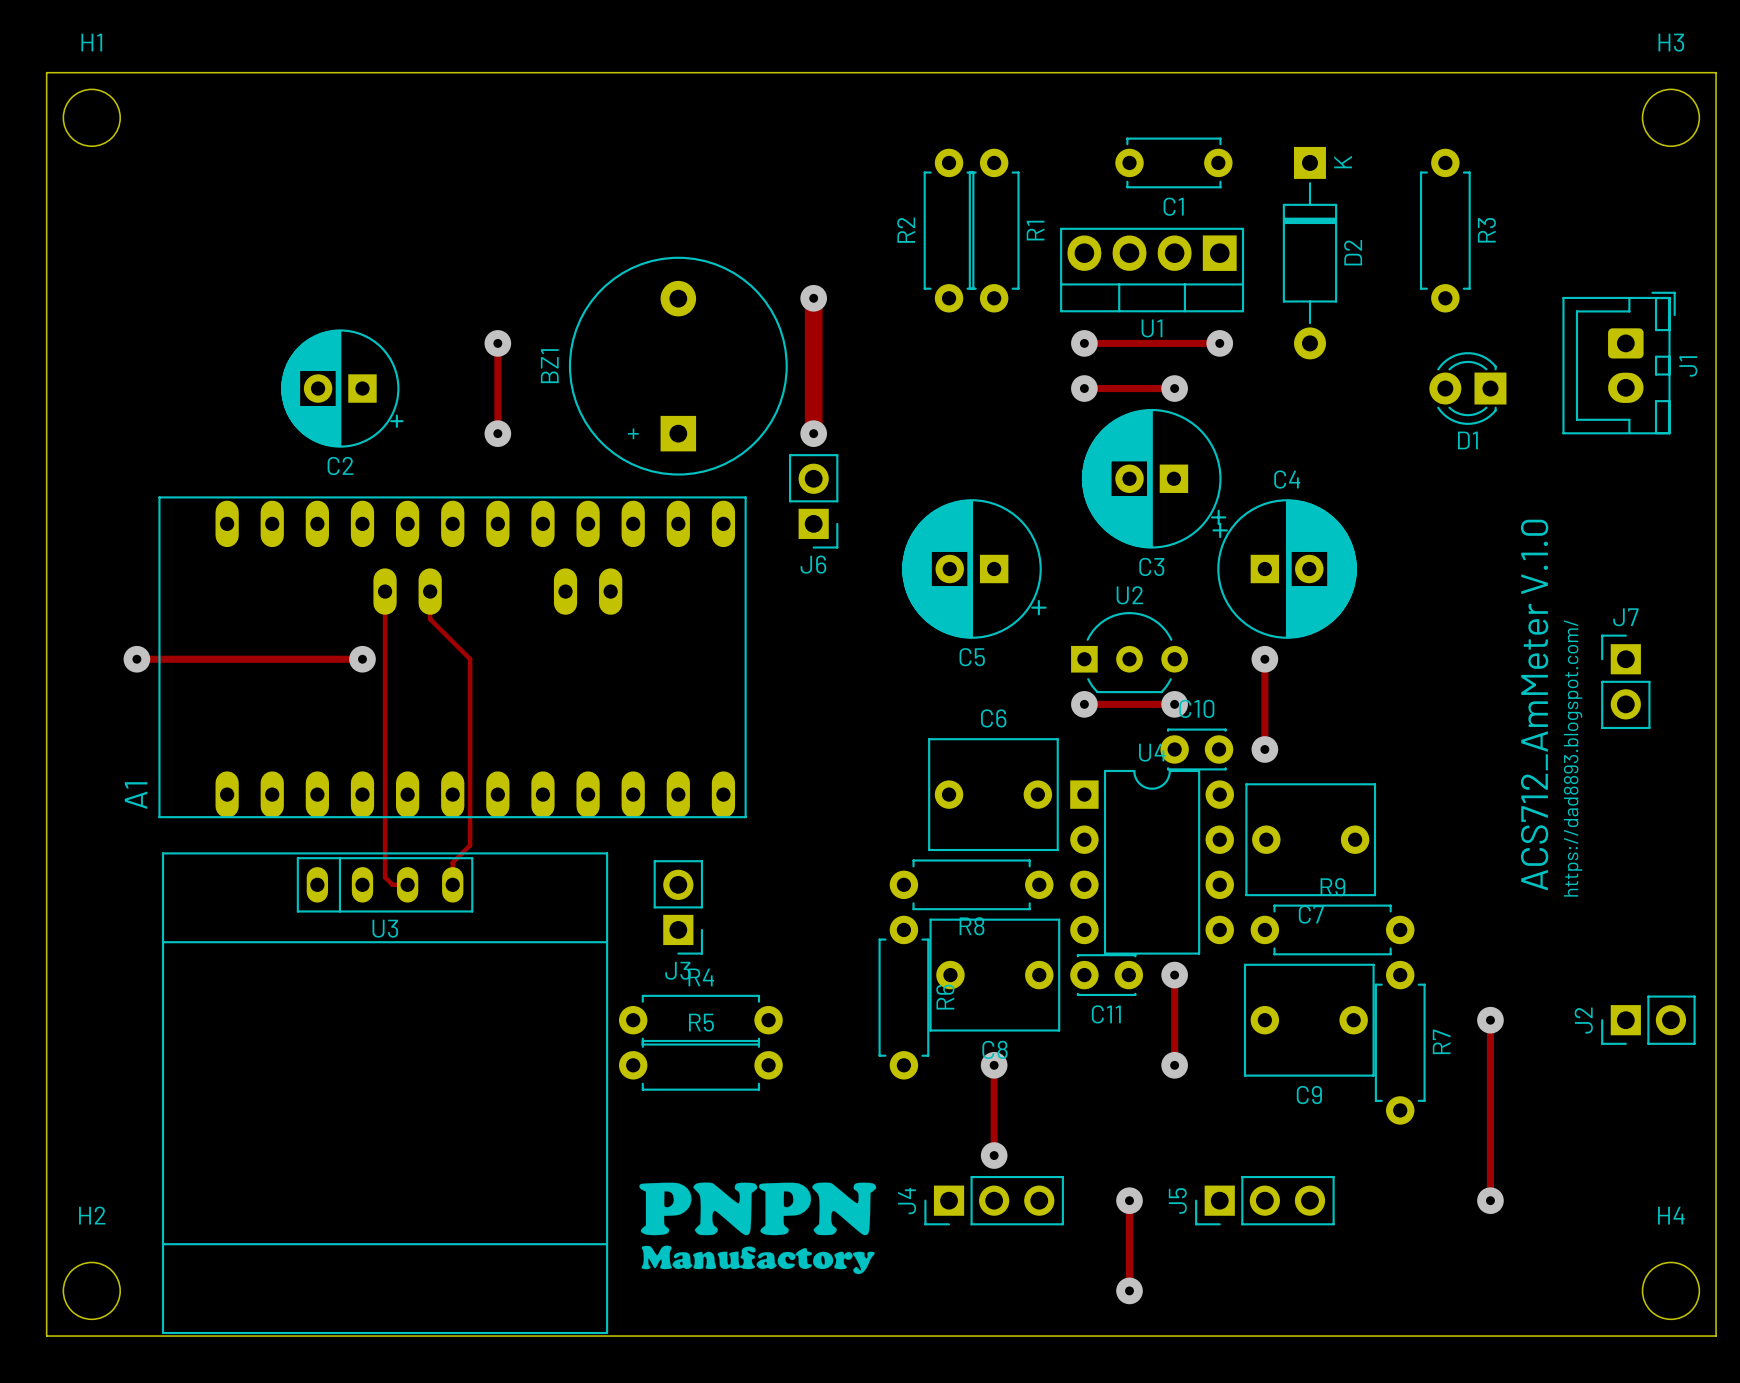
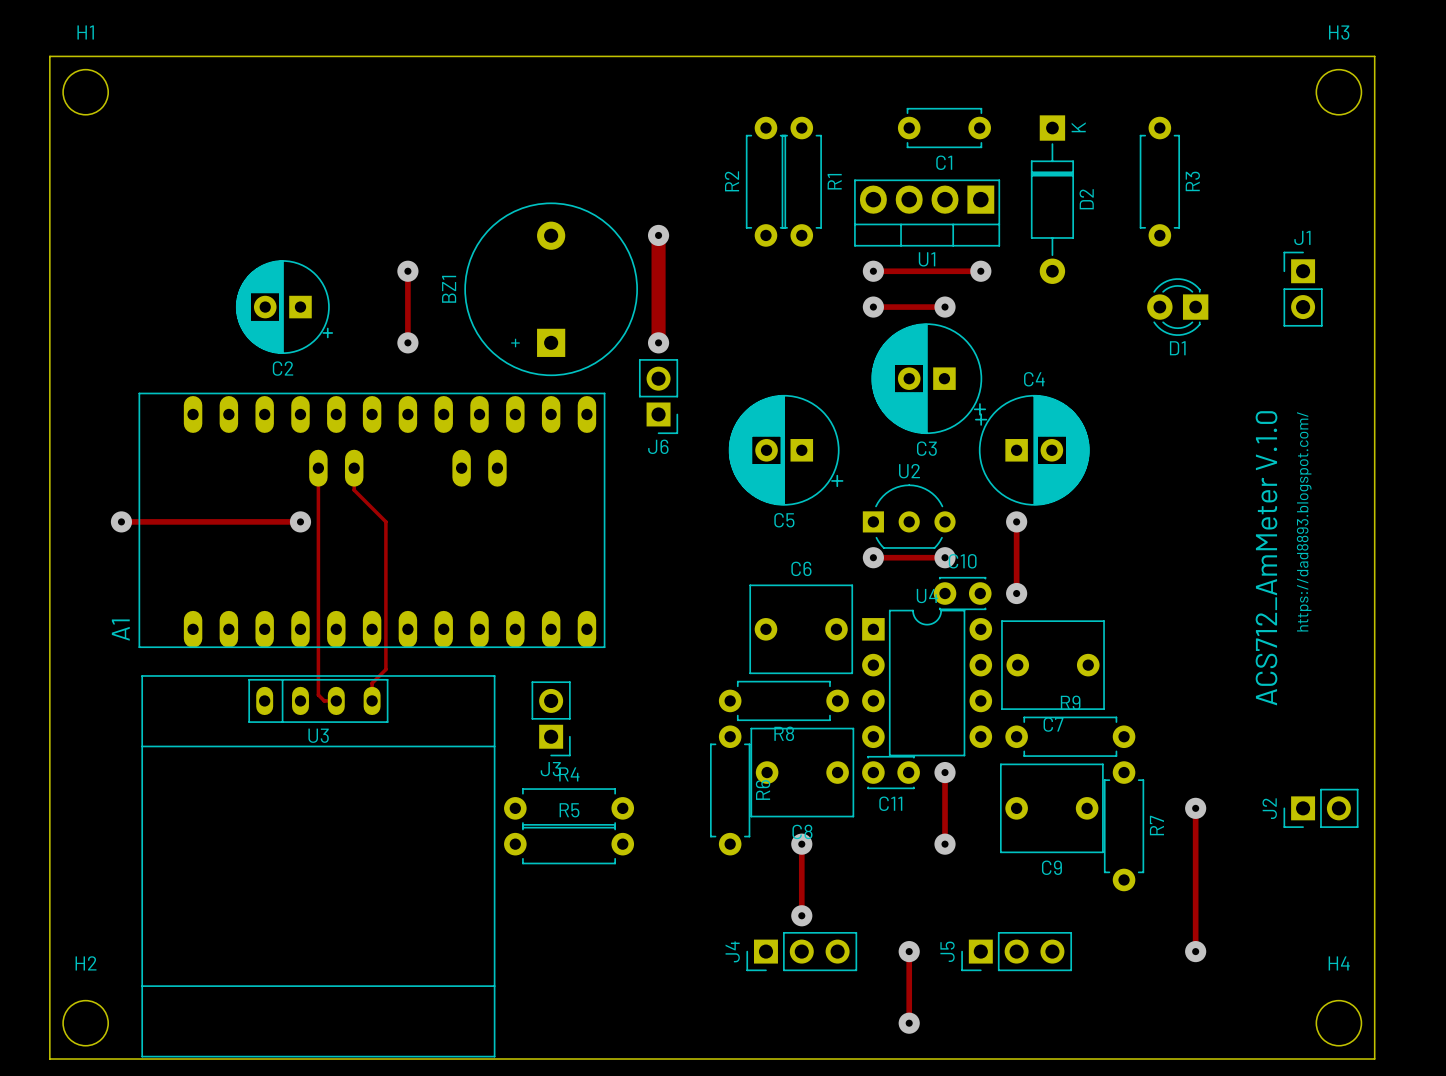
J1 footprint: [1562, 291, 1676, 435] -> [1283, 251, 1323, 327]
J1 name position: J1 (1688, 366) -> J1 (1302, 237)
J7: (1625, 681) -> none
text position: ACS712_AmMeter V.1.0 (1534, 705) -> ACS712_AmMeter V.1.0 (1266, 558)
text position: https://dad8893.blogspot.com/ (1573, 758) -> https://dad8893.blogspot.com/ (1304, 521)
drawing: [639, 1182, 877, 1275] -> none

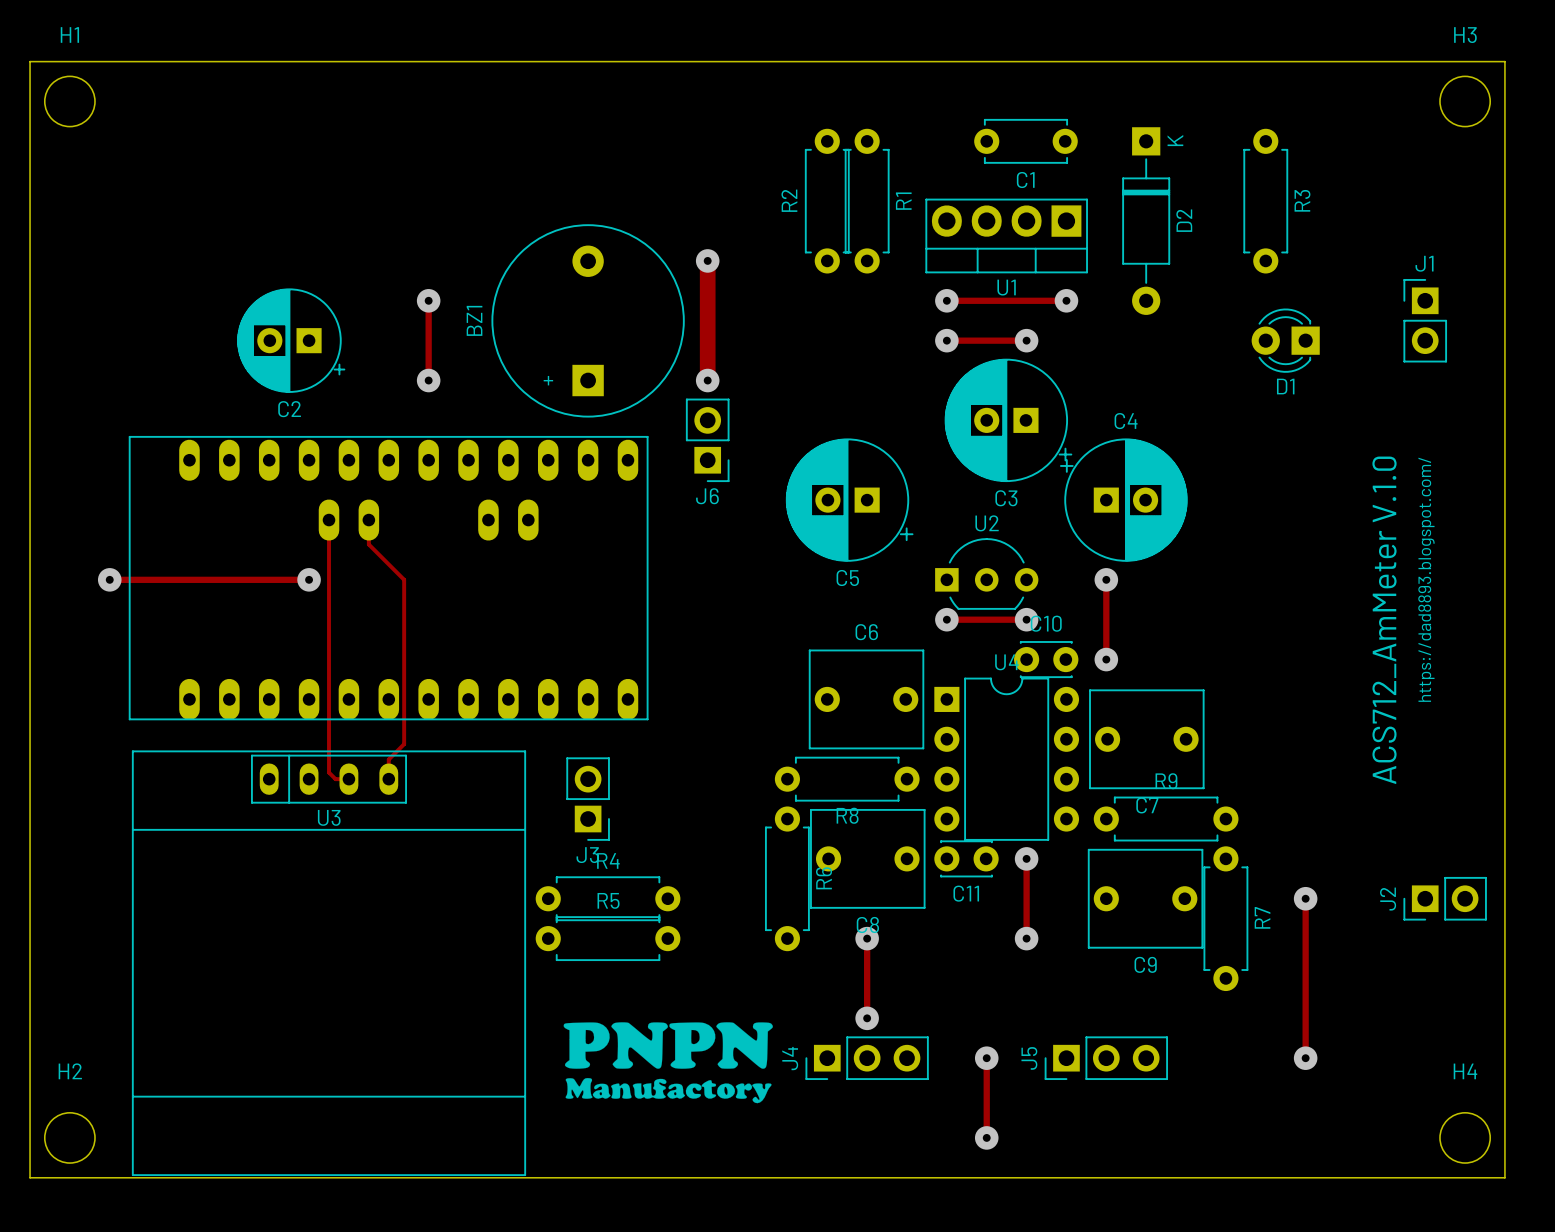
A1 name: A1 (120, 630) -> none
drawing: none -> [563, 1022, 773, 1104]

